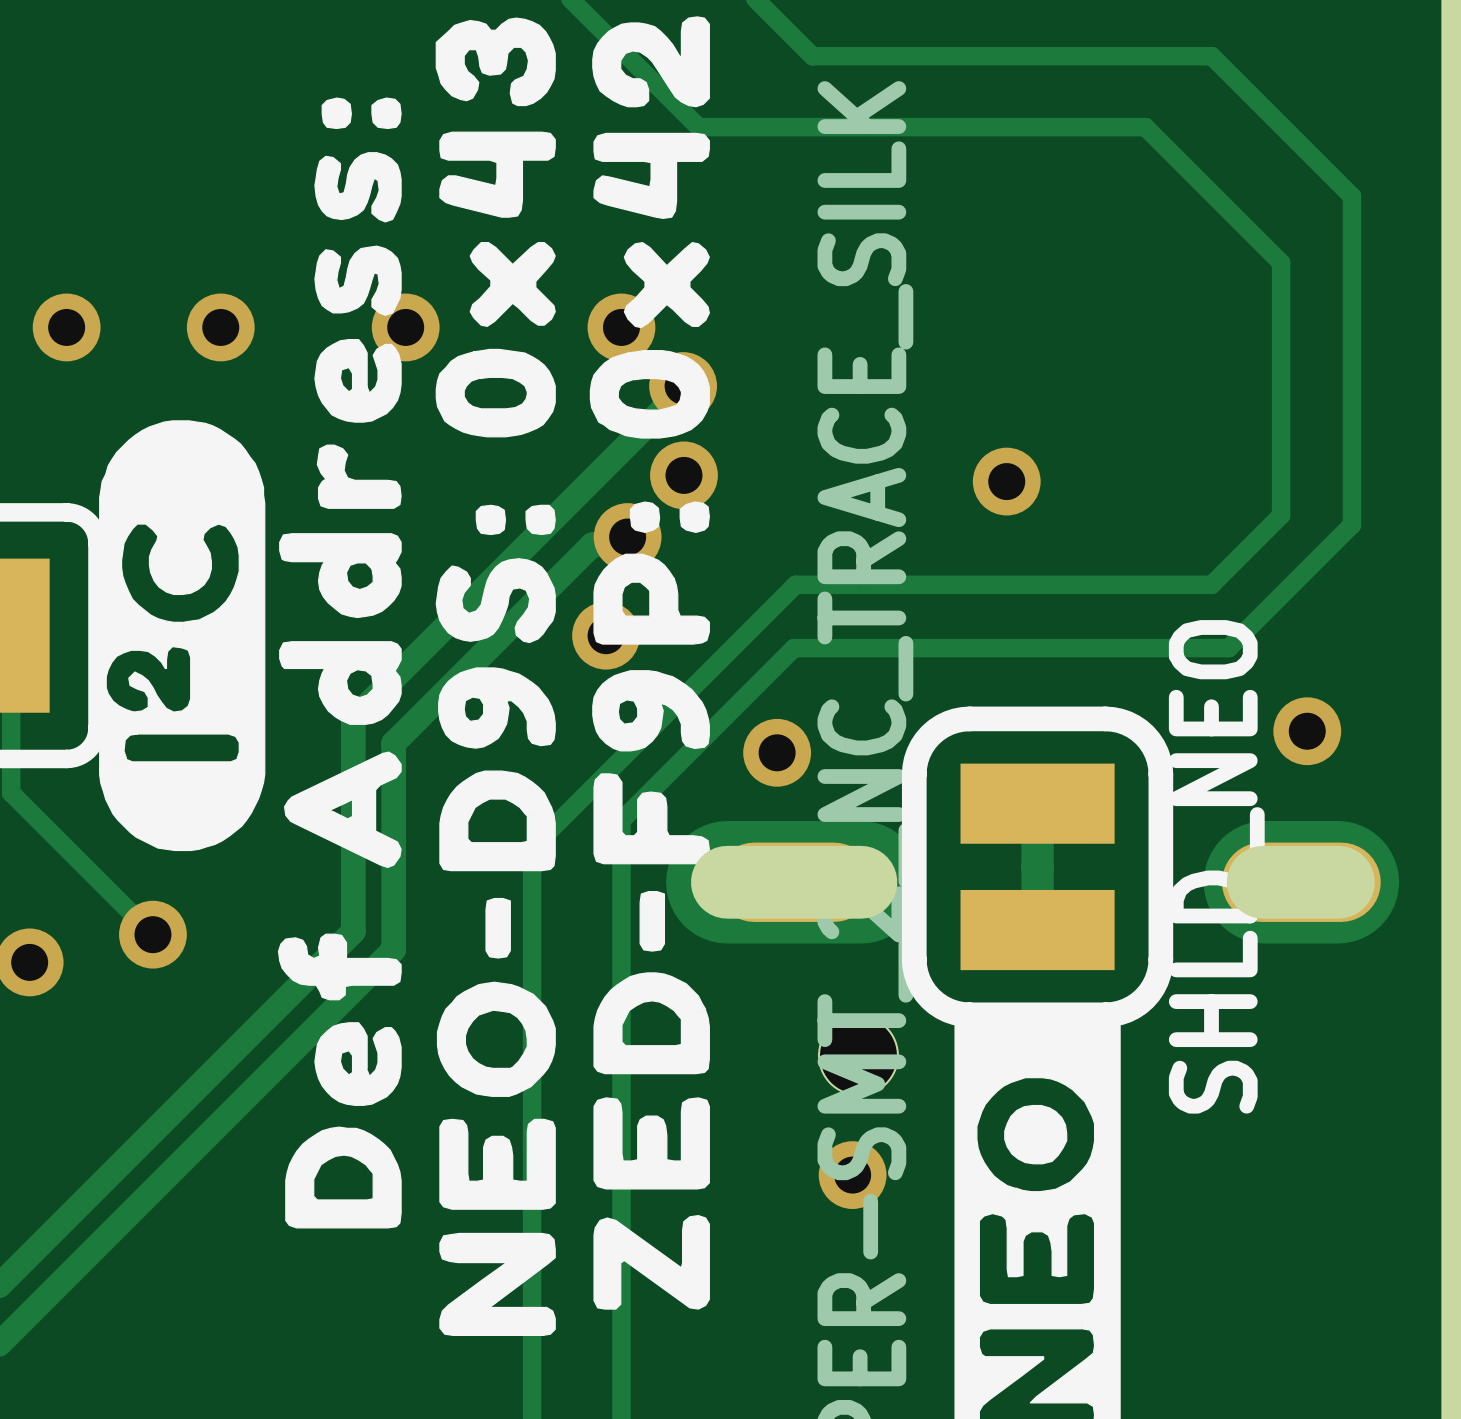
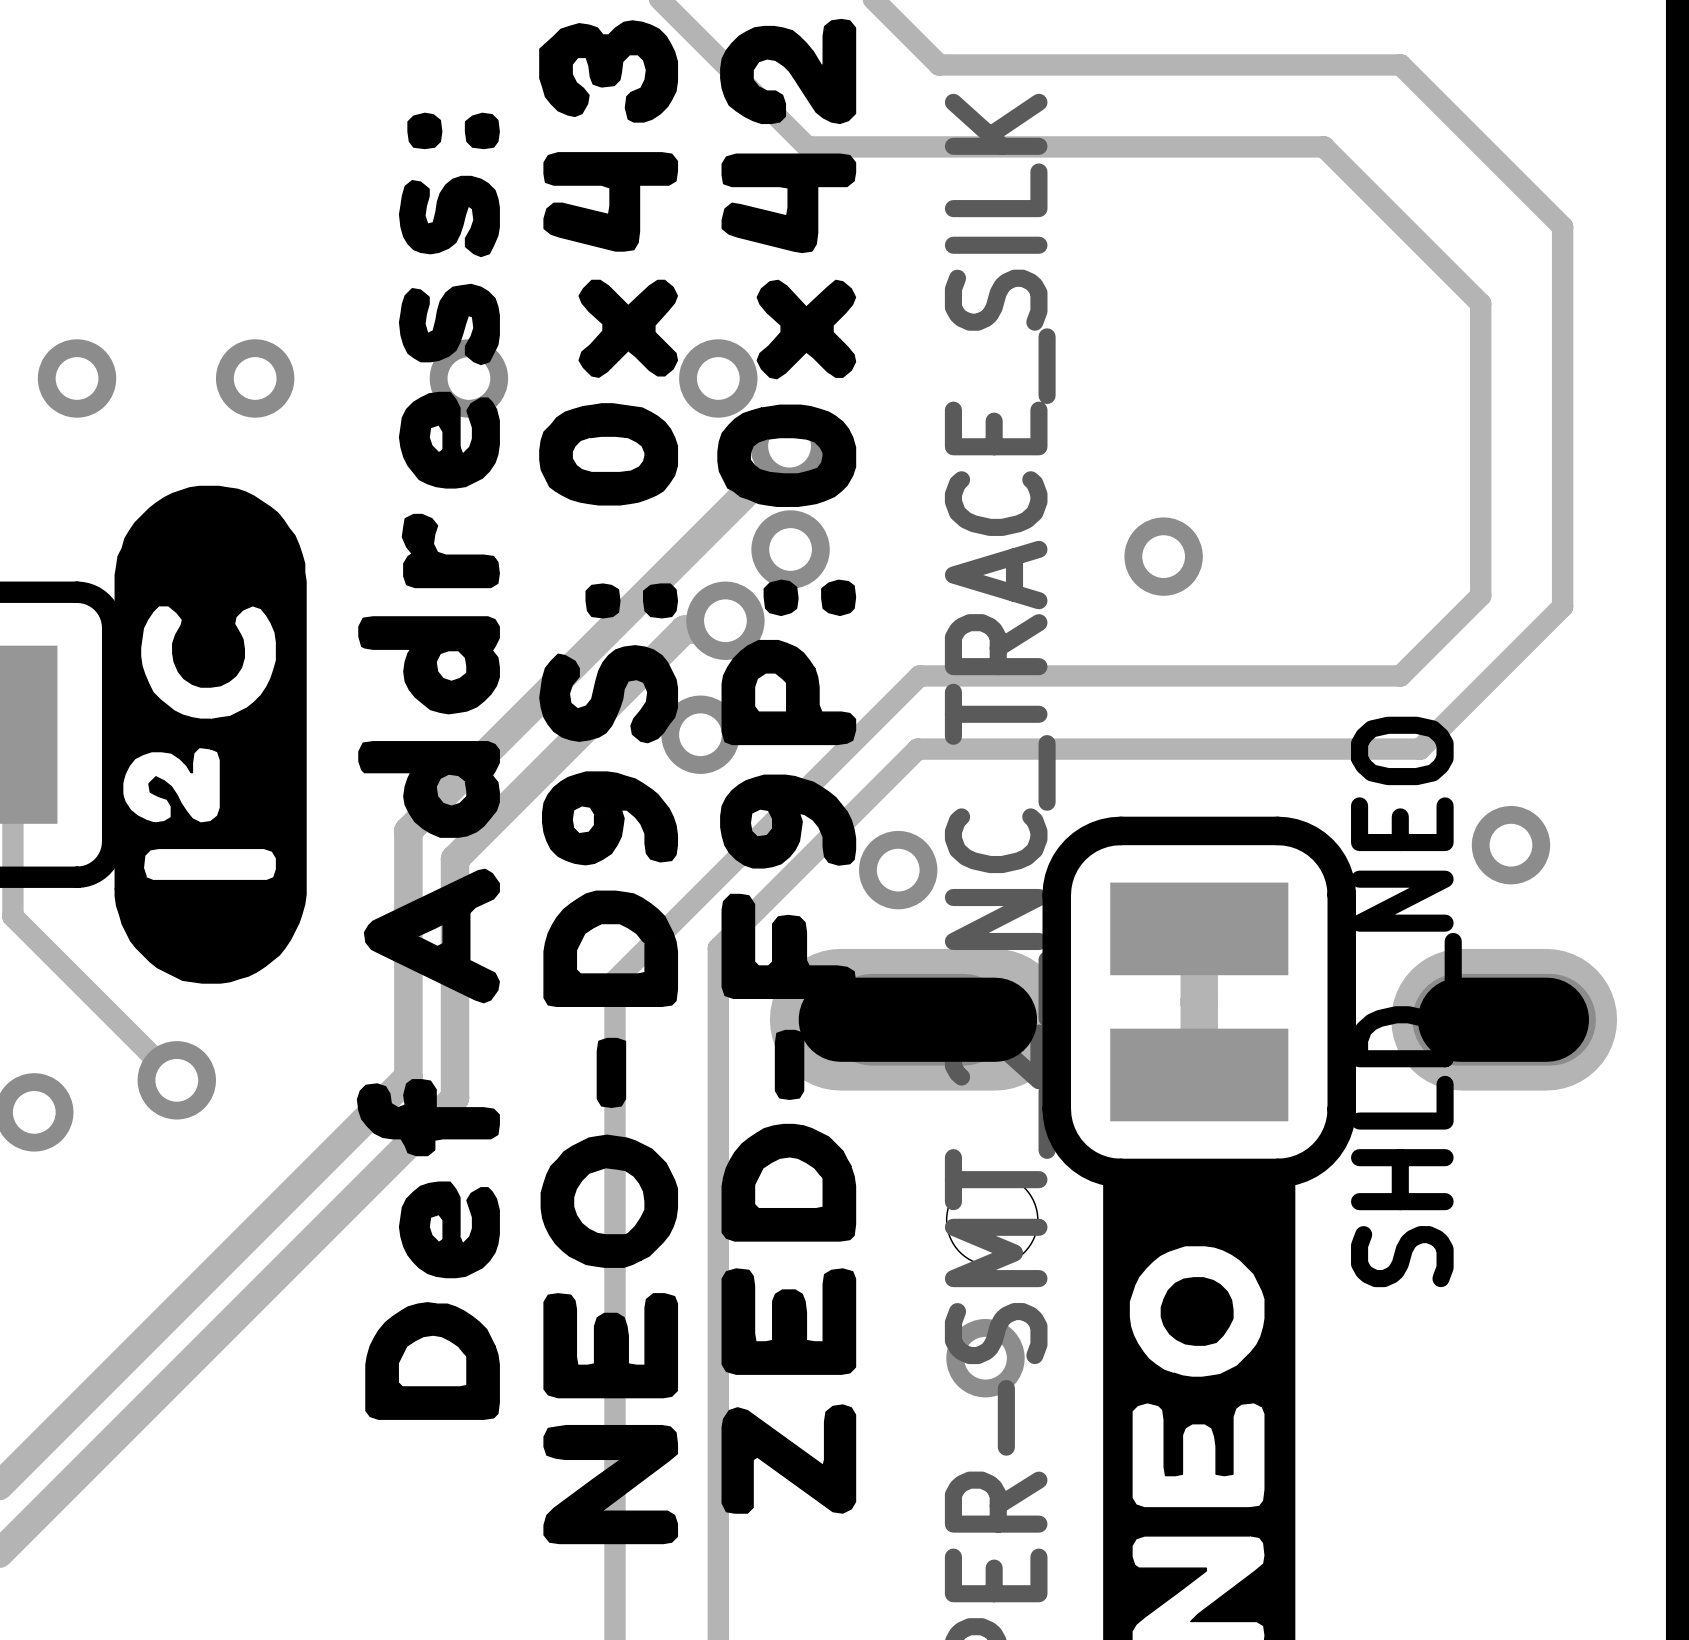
drawing position: (495, 227) -> (608, 262)
drawing position: (649, 227) -> (786, 262)
drawing position: (339, 662) -> (428, 766)
drawing position: (651, 905) -> (788, 1046)
drawing position: (495, 920) -> (608, 1063)

